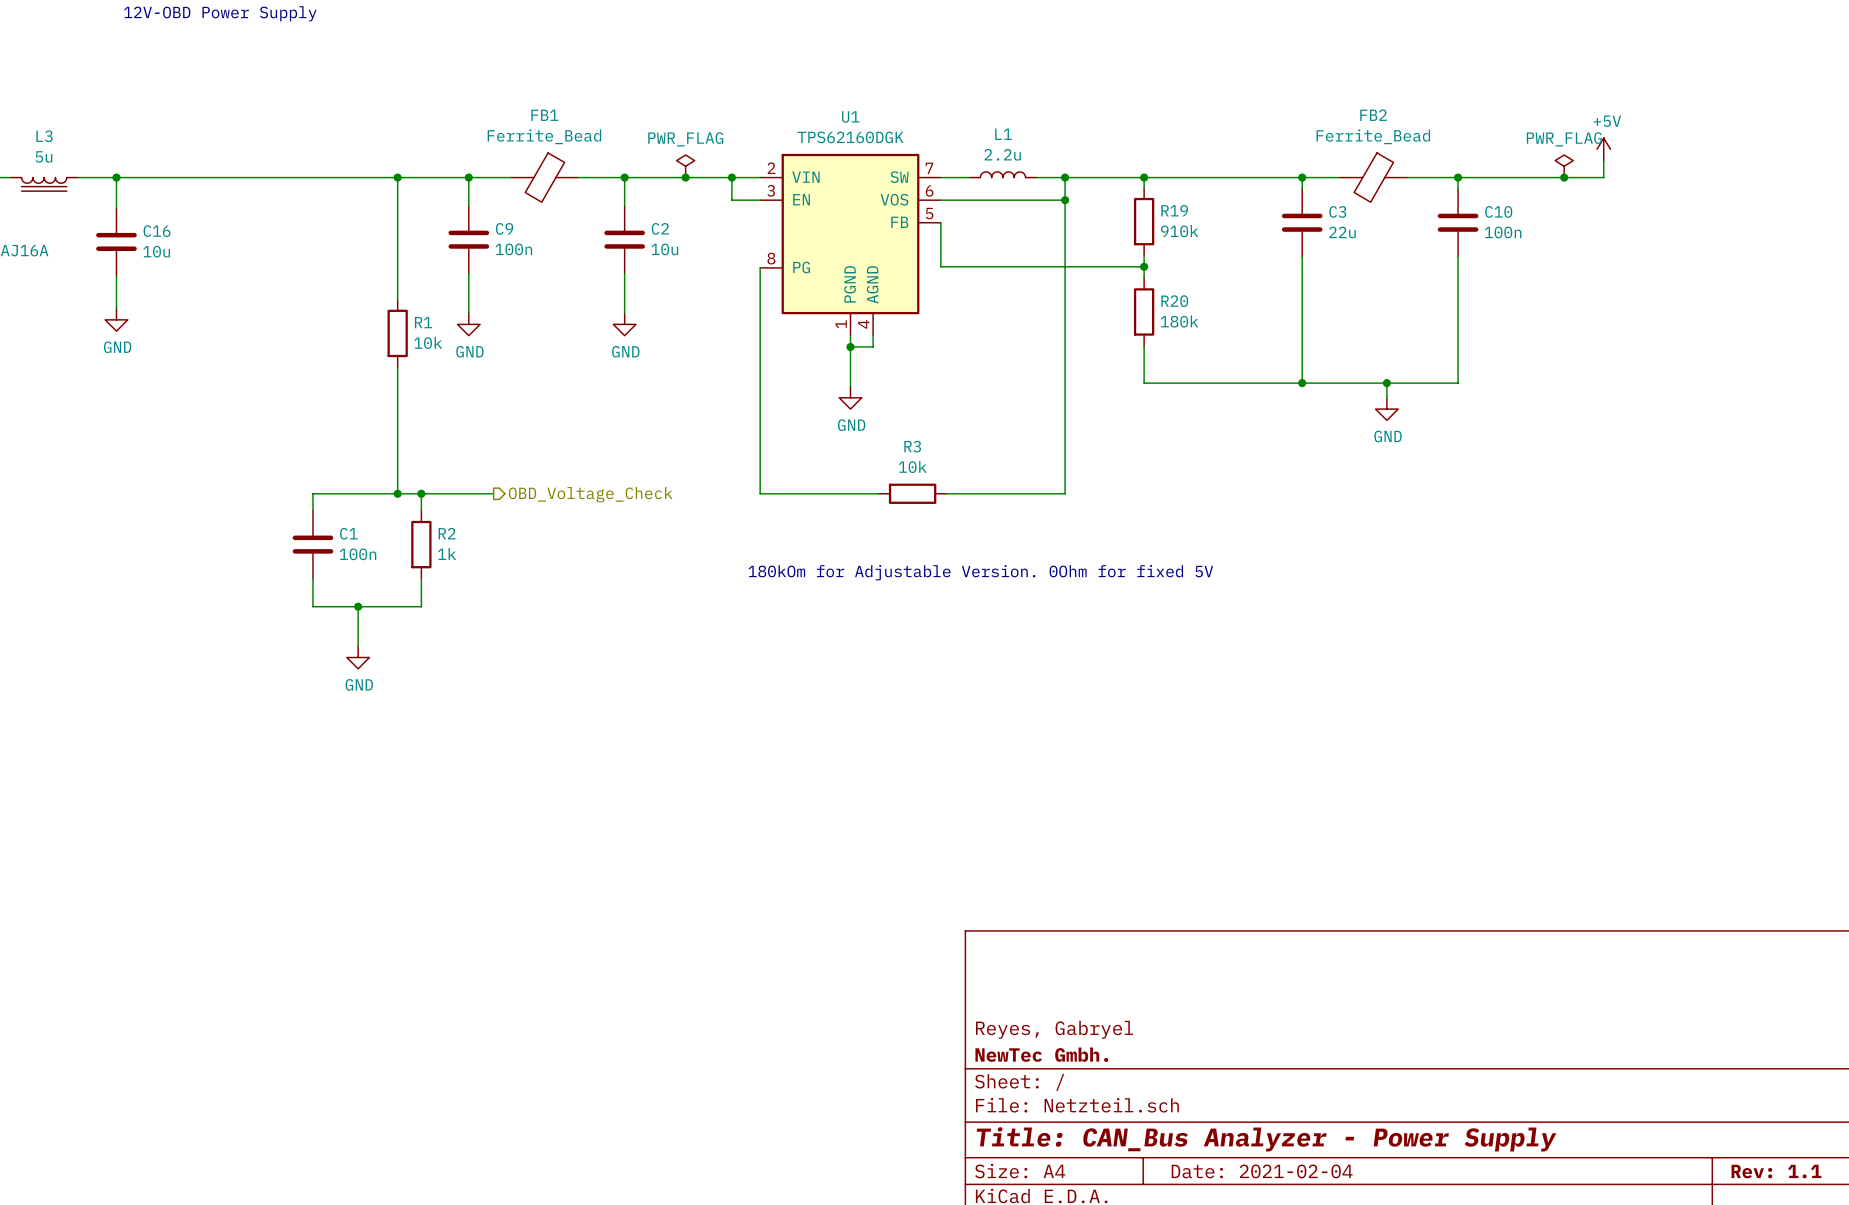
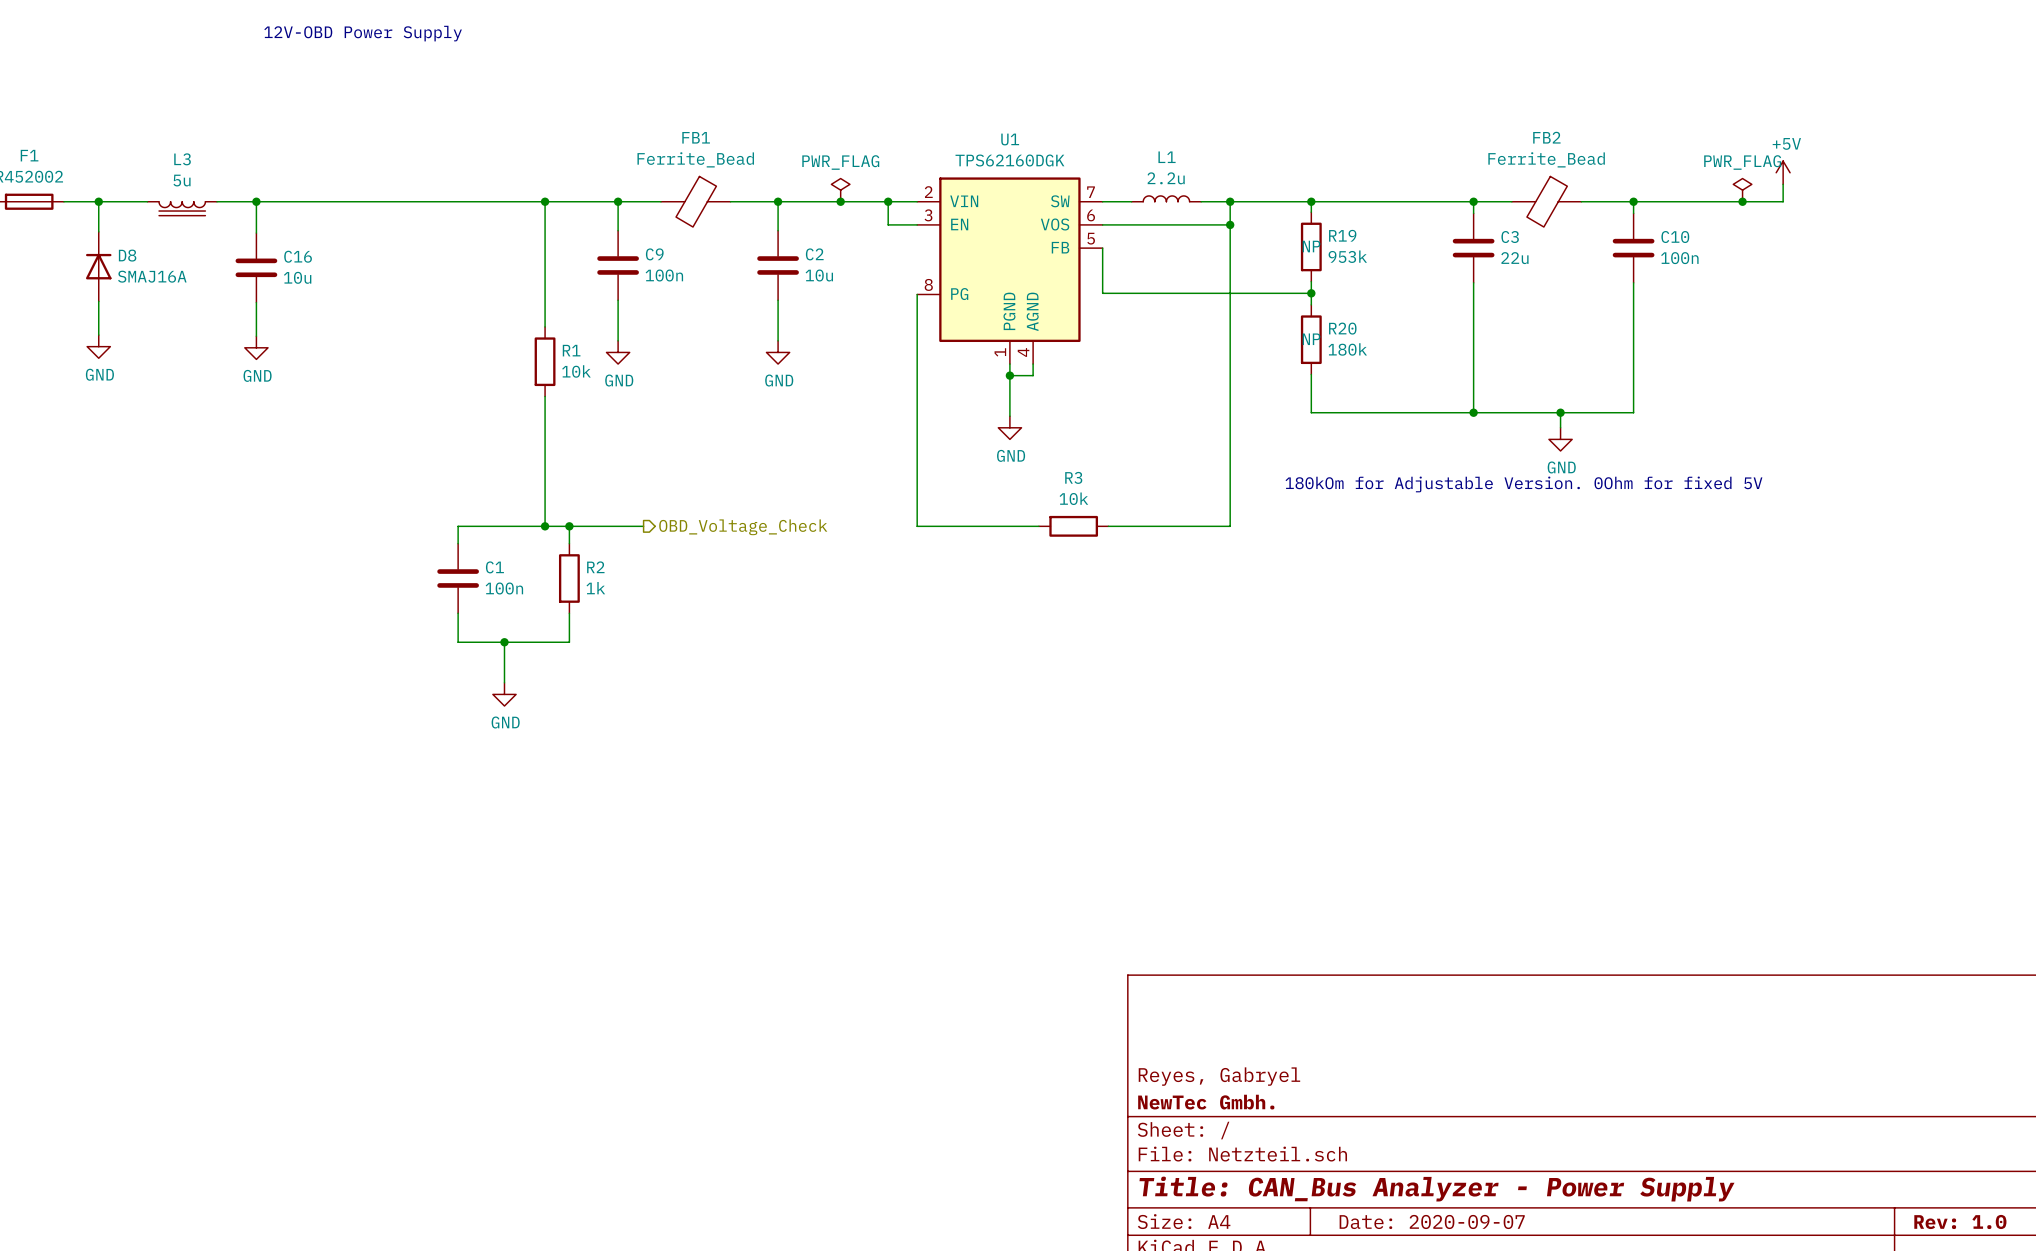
R19 text: none -> NP (1311, 246)
R19 value: 910k (1179, 231) -> 953k (1347, 256)
R20 text: none -> NP (1311, 339)
text: none -> 180kOm for Adjustable Version. 0Ohm for fixed 5V (1523, 484)
text: 180kOm for Adjustable Version. 0Ohm for fixed 5V (980, 572) -> none
title block: Date: 2021-02-04 (1262, 1171) -> Date: 2020-09-07 (1432, 1221)
title block: Rev: 1.1 (1776, 1171) -> Rev: 1.0 (1960, 1221)

